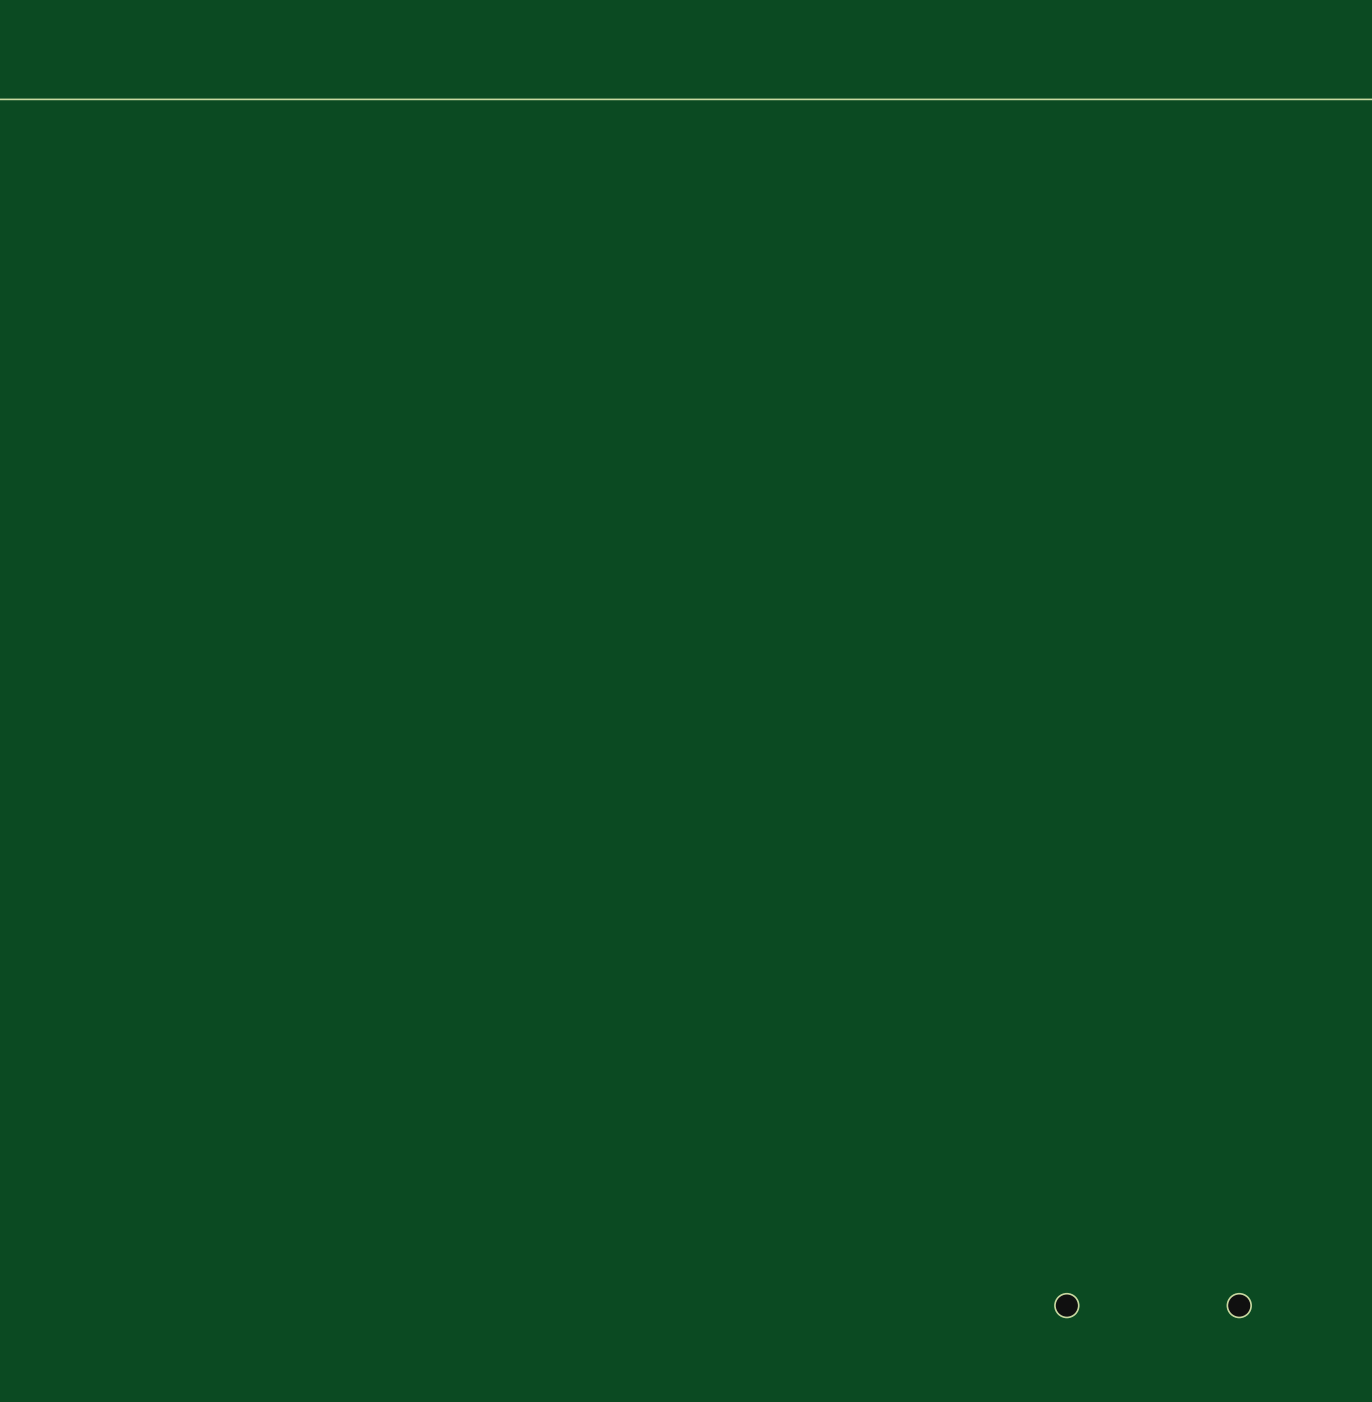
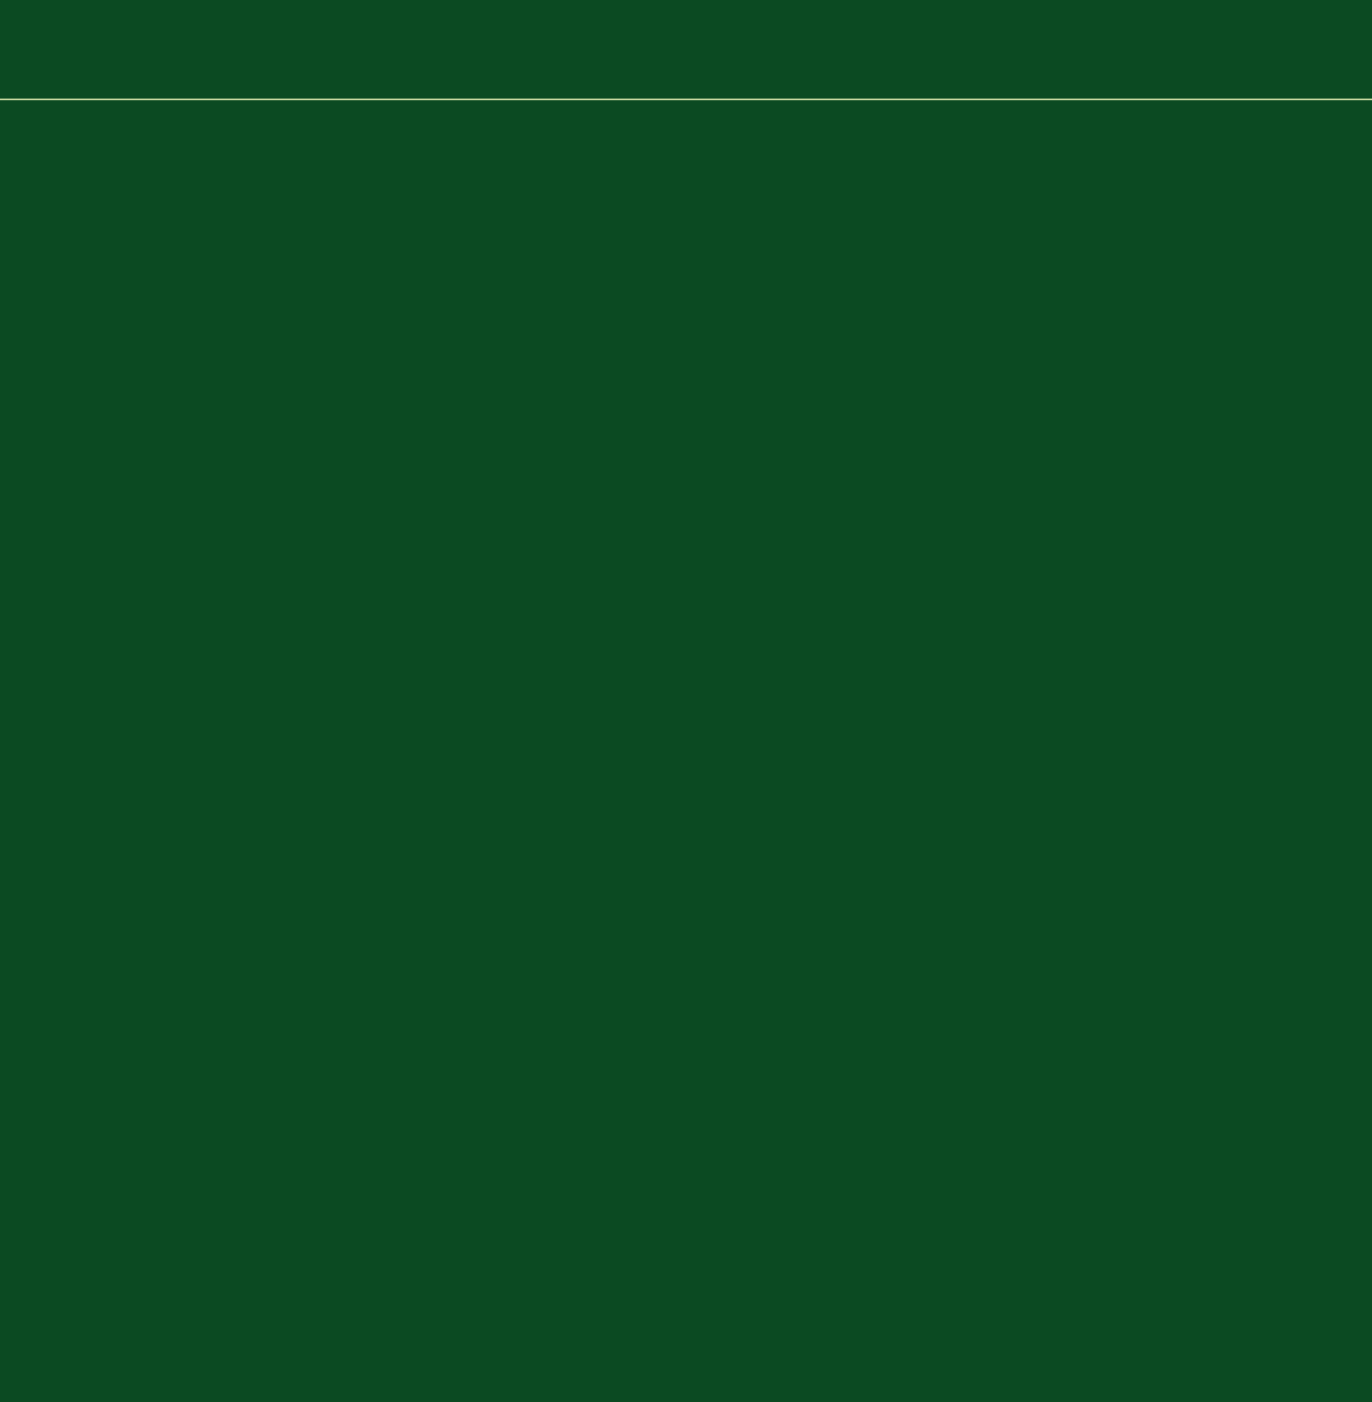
hole: (1066, 1305) -> none
hole: (1239, 1305) -> none

